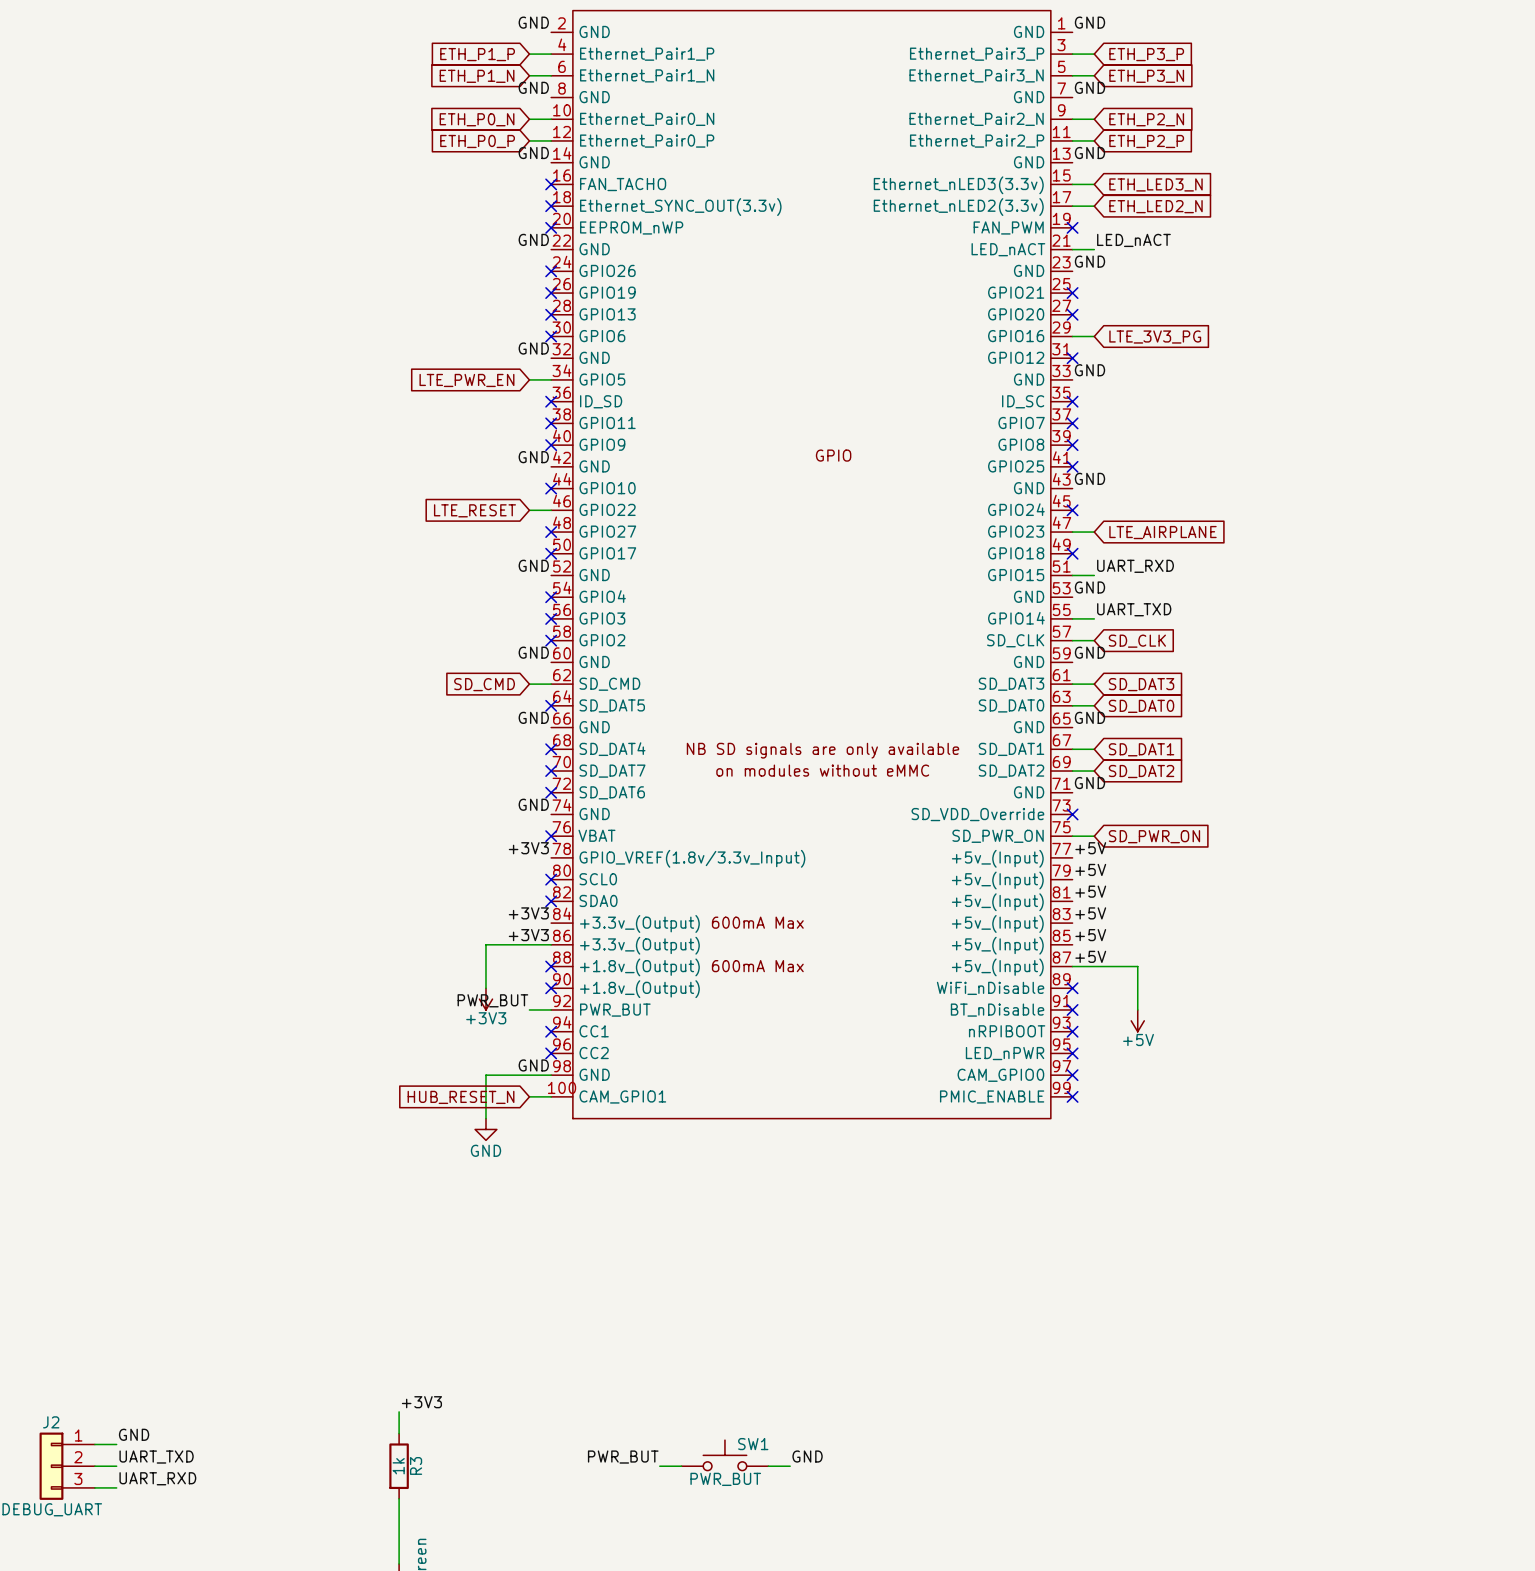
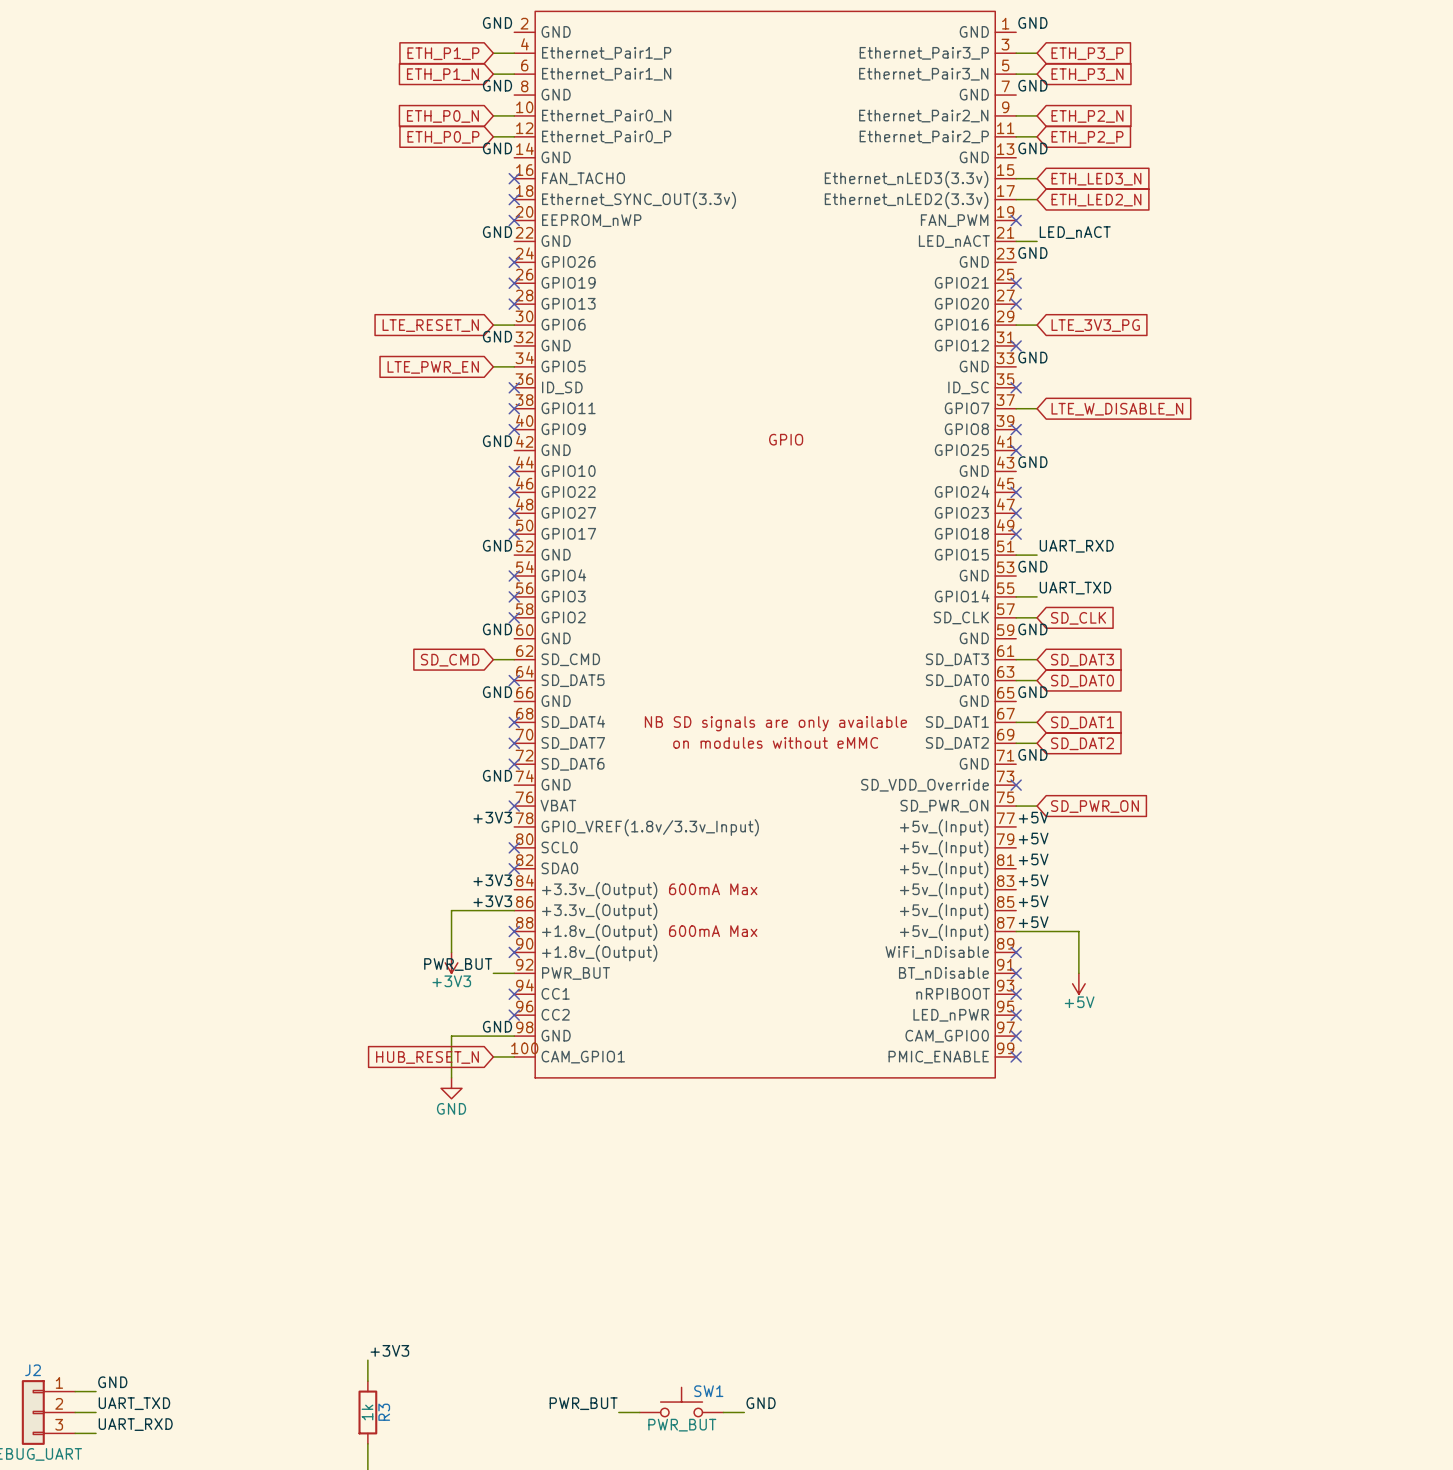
no-connect mark: (551, 336) -> none
global label: none -> LTE_RESET_N (430, 325)
no-connect mark: (1072, 423) -> none
global label: none -> LTE_W_DISABLE_N (1117, 409)
global label: LTE_RESET (474, 510) -> none
wire: (529, 510) (551, 510) -> (493, 325) (514, 325)
no-connect mark: none -> (514, 492)
wire: (1072, 532) (1094, 532) -> (1016, 408) (1037, 408)
no-connect mark: none -> (1016, 513)
global label: LTE_AIRPLANE (1162, 532) -> none

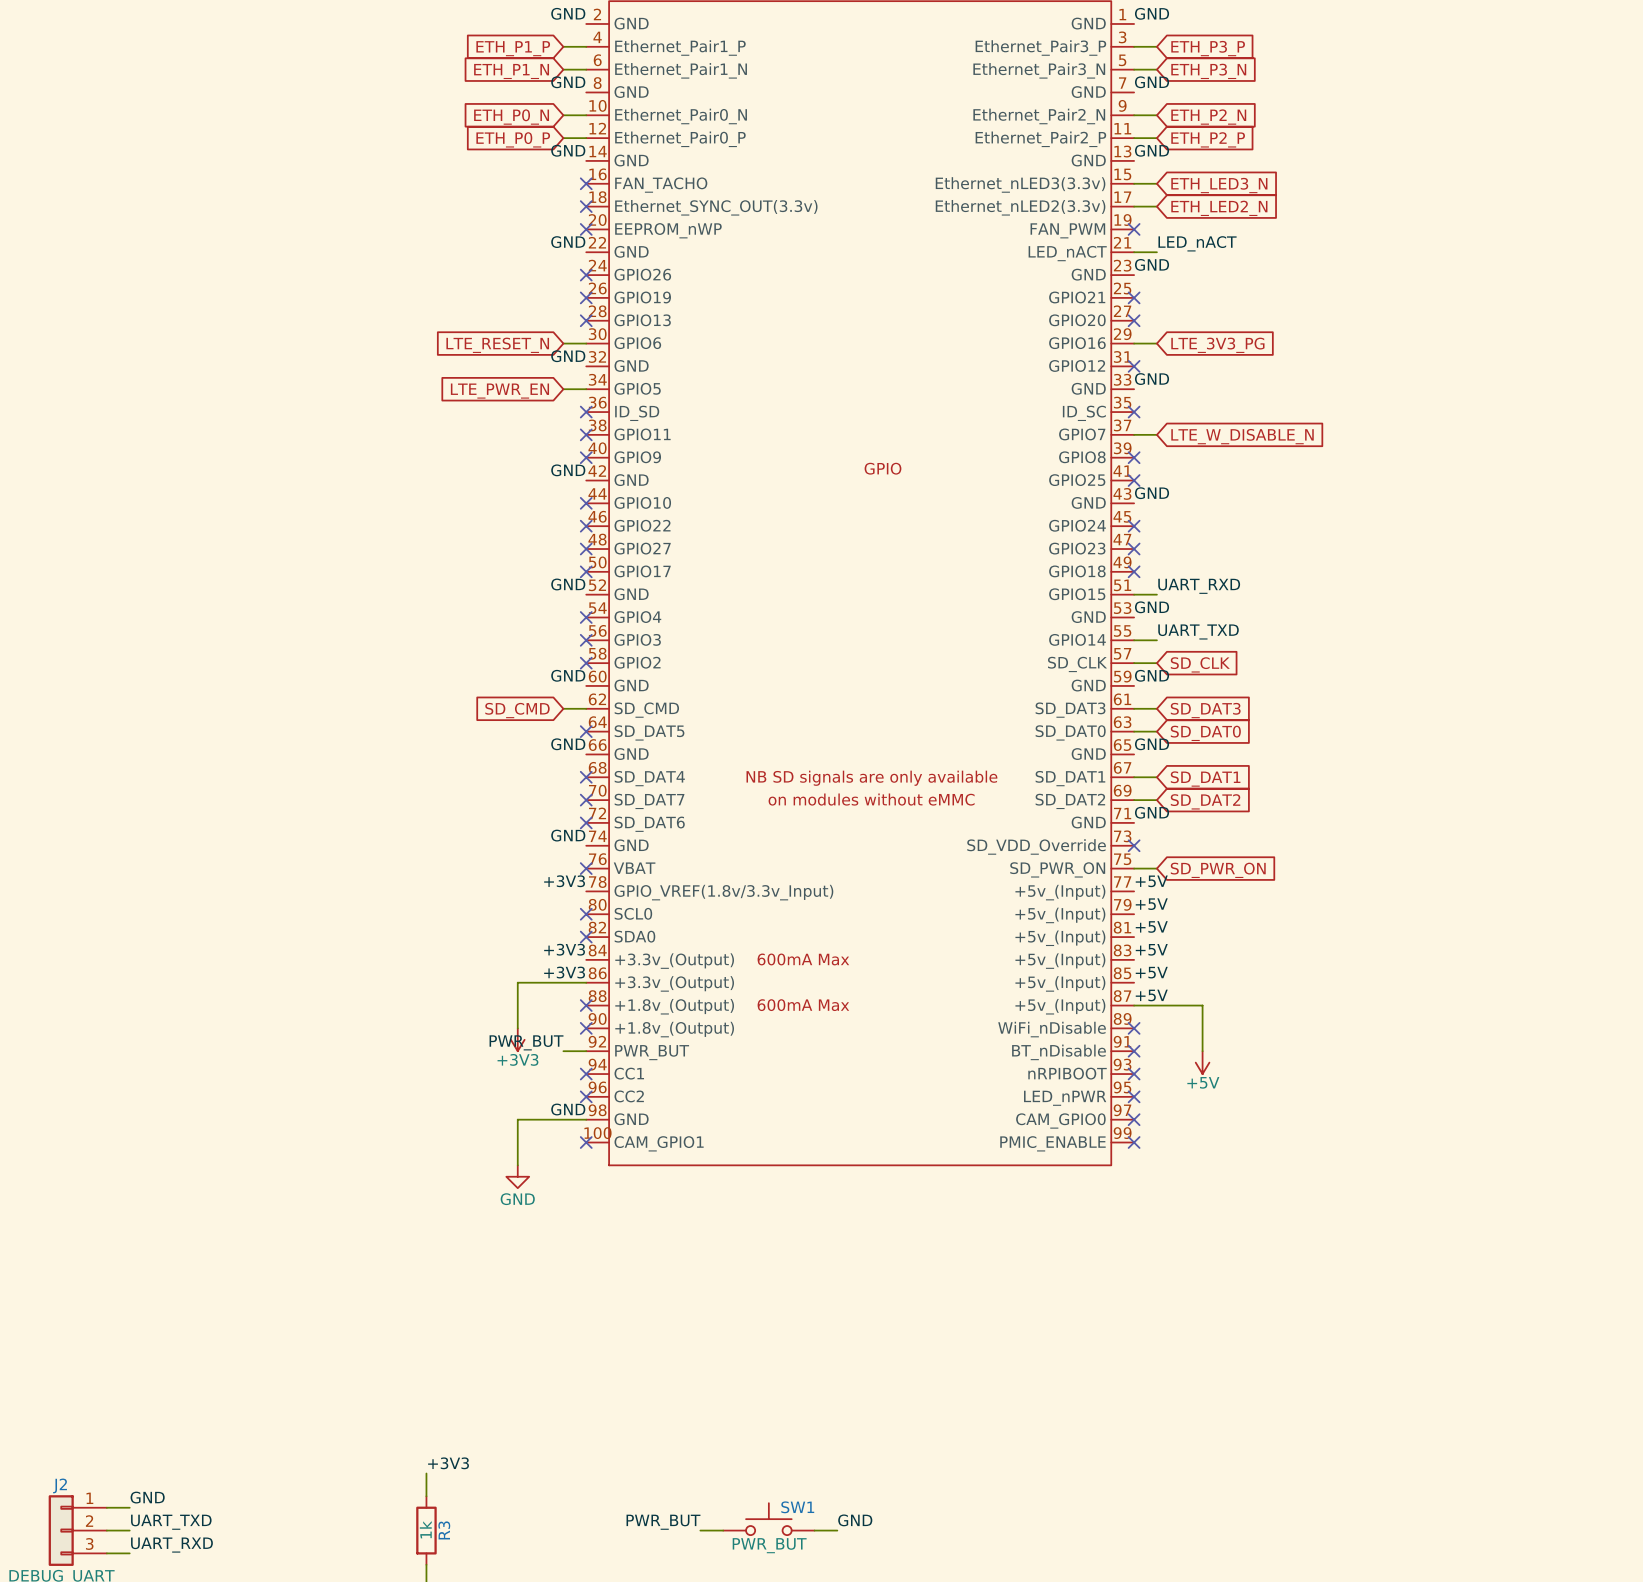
wire: (493, 1056) (514, 1056) -> none
no-connect mark: none -> (586, 1142)
global label: HUB_RESET_N (427, 1057) -> none

